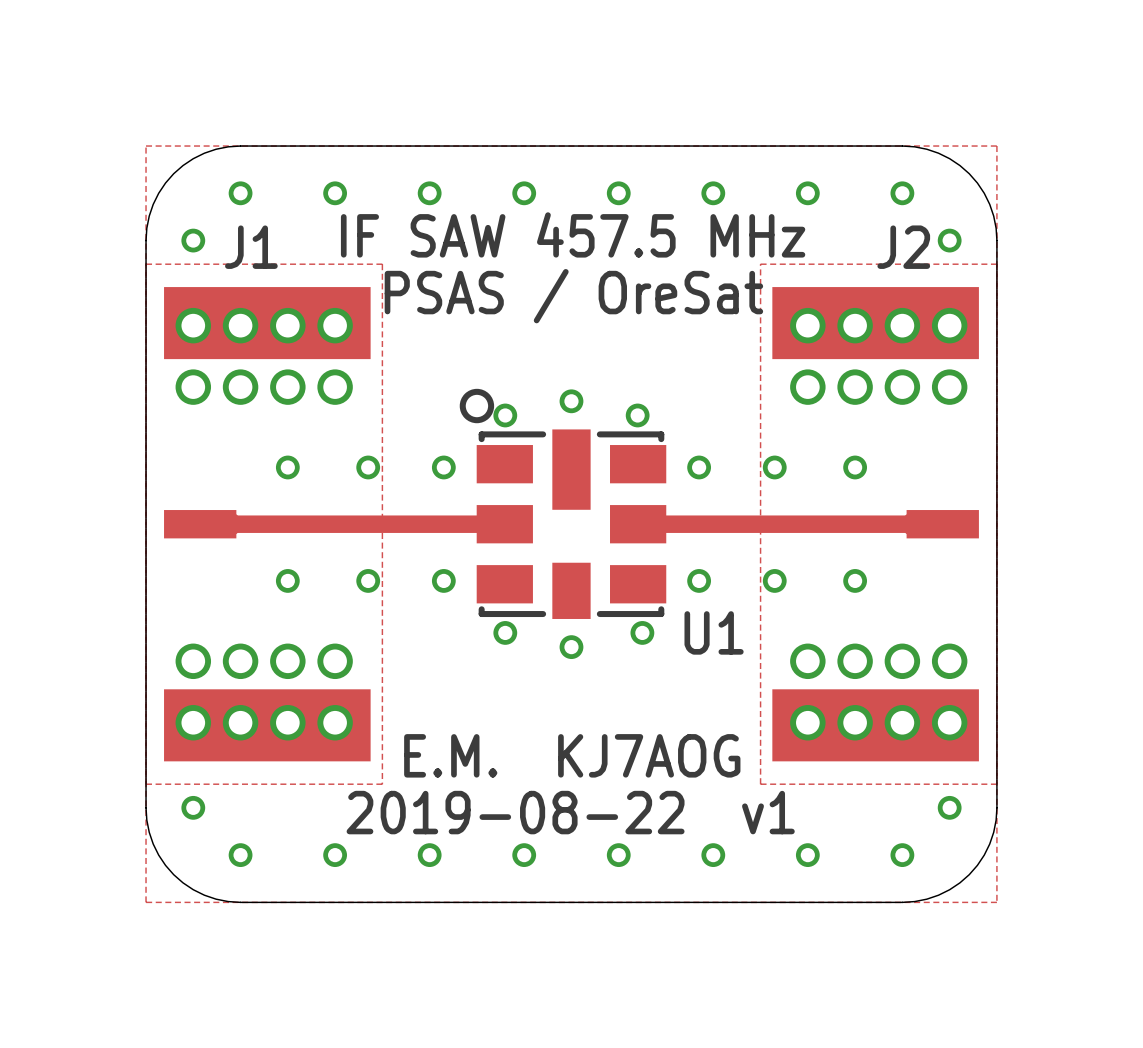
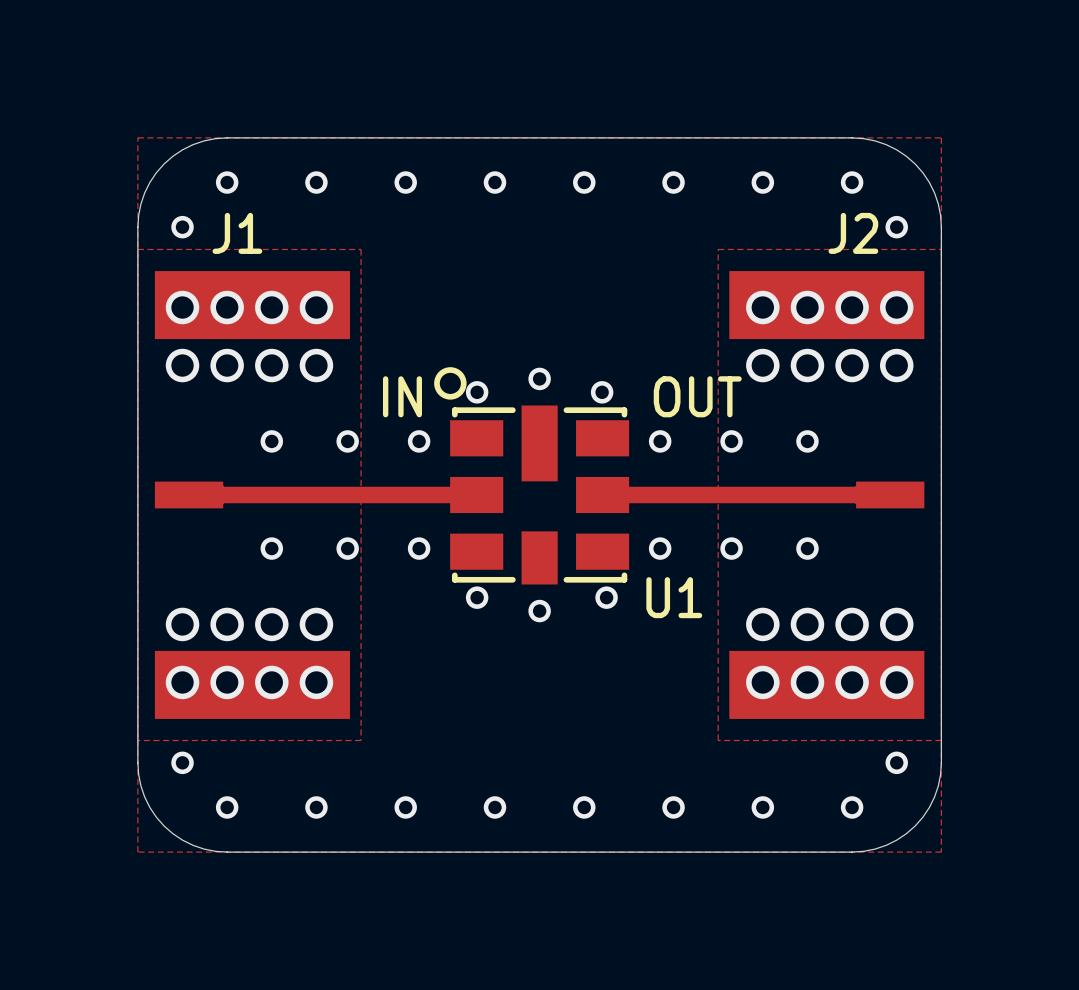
text: IF SAW 457.5 MHz (573, 234) -> none
text: PSAS / OreSat (573, 296) -> none
text: none -> IN (402, 396)
text: none -> OUT (697, 396)
text: E.M. KJ7AOG (572, 755) -> none
text: 2019-08-22 v1 (570, 812) -> none

